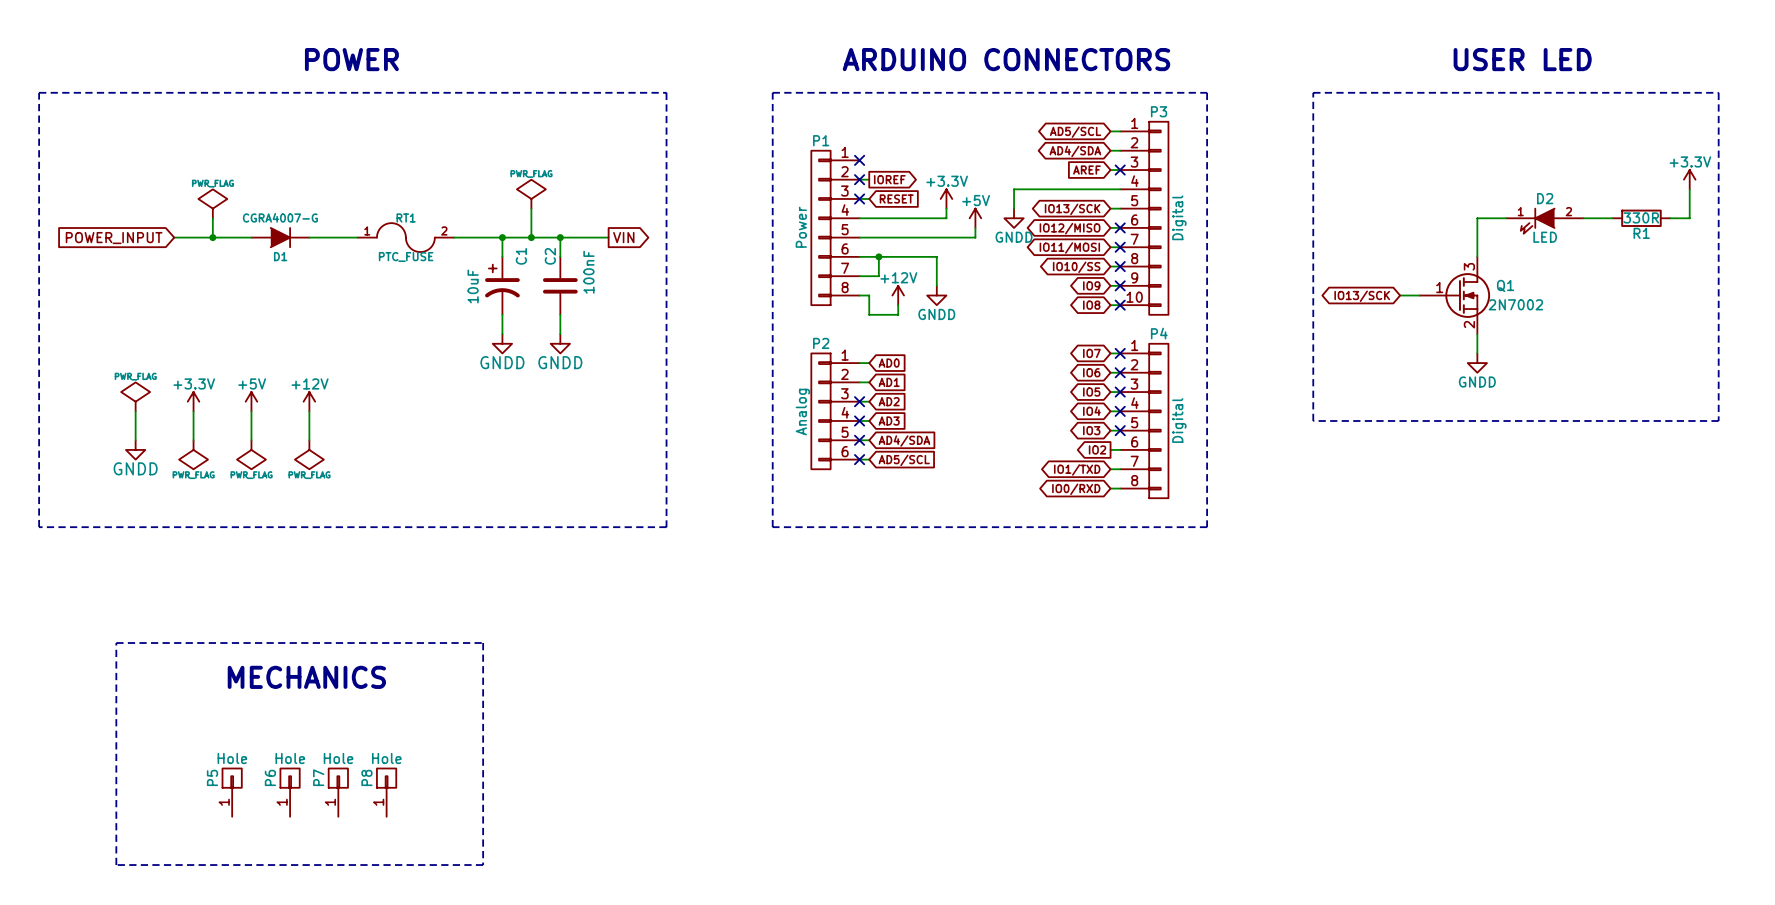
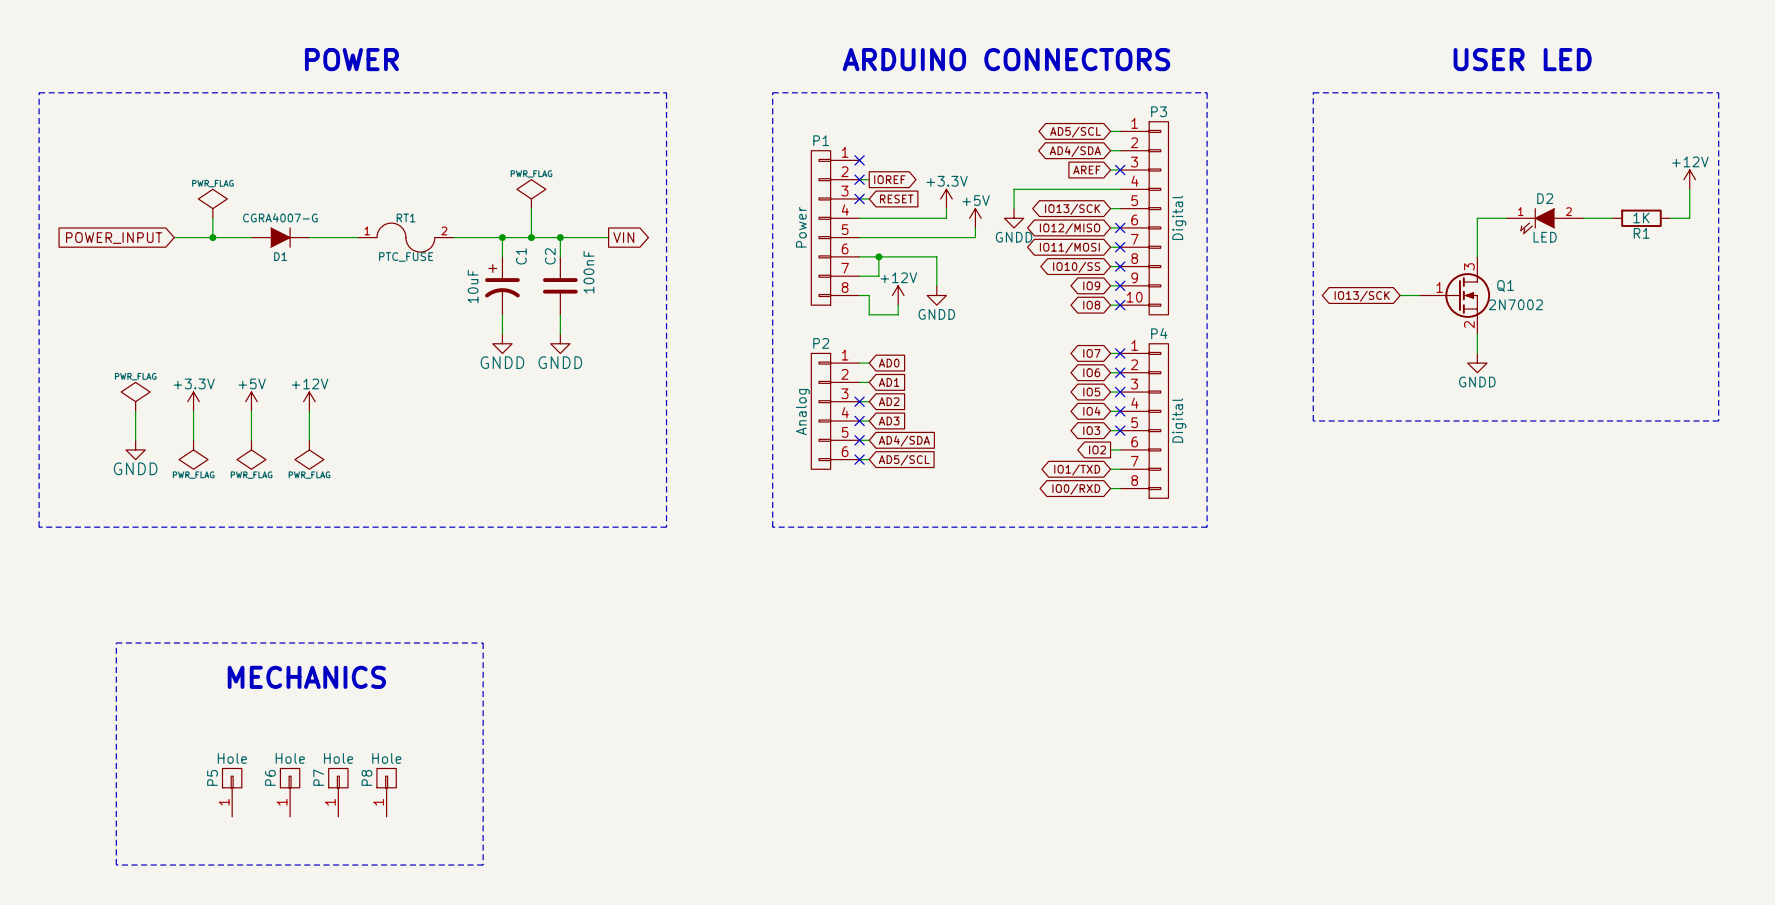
power symbol: +3.3V (1689, 179) -> +12V (1689, 179)
R1 value: 330R (1641, 217) -> 1K (1641, 217)

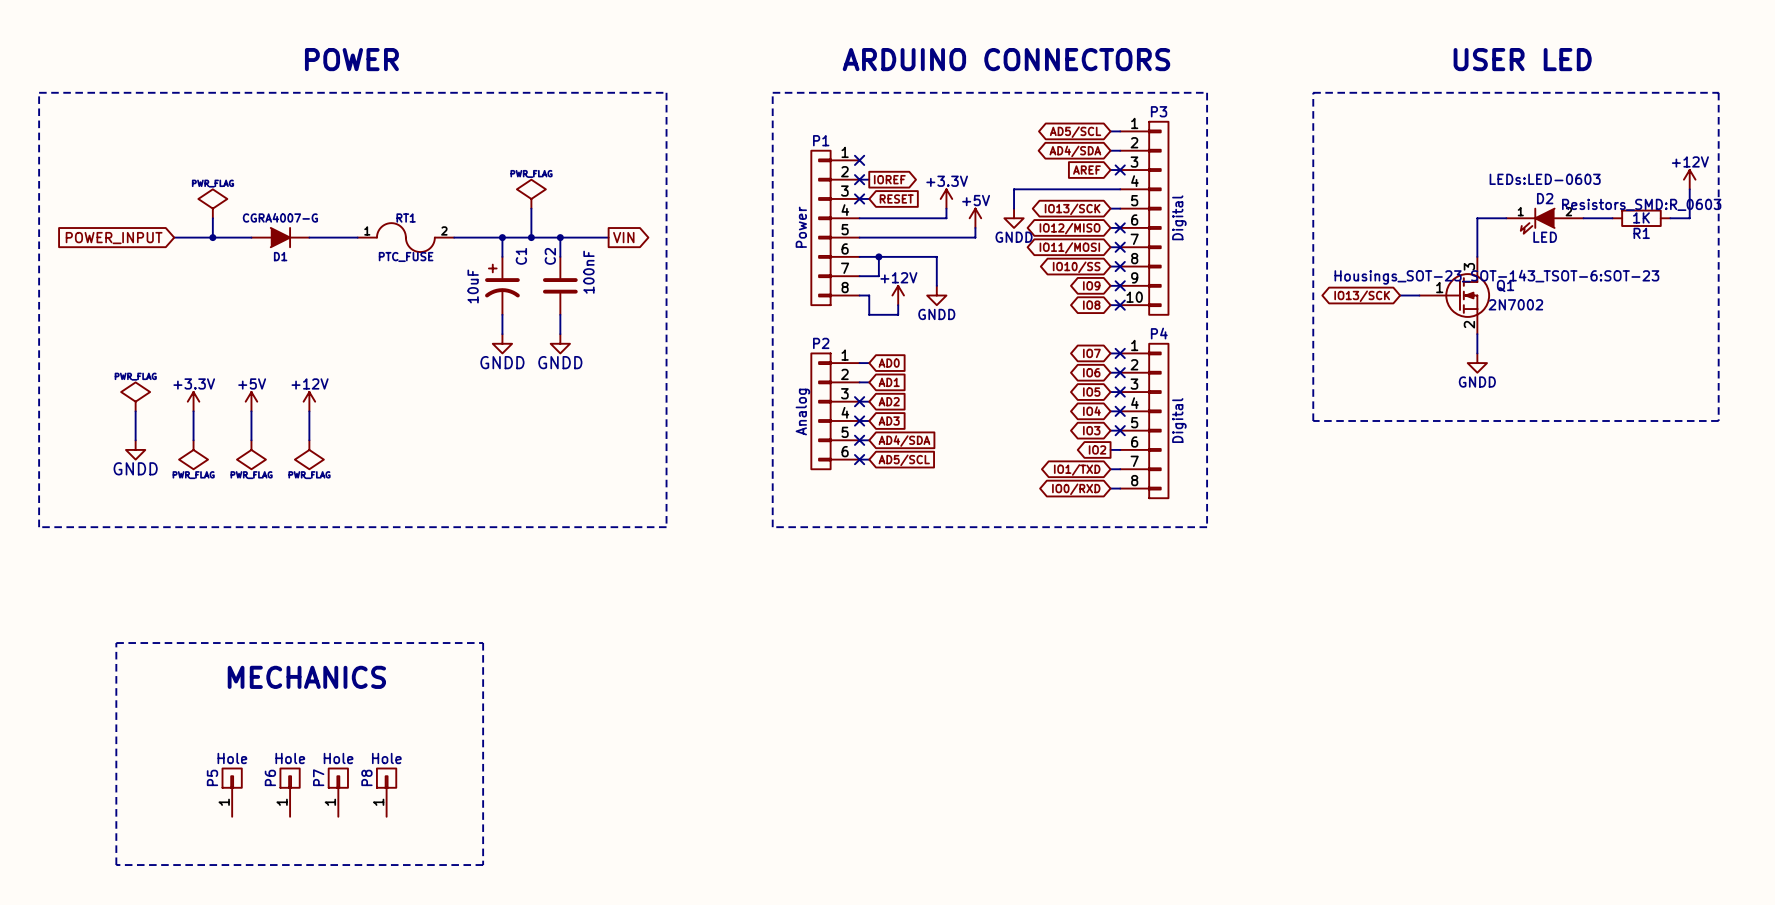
D2 text: none -> LEDs:LED-0603 (1545, 179)
R1 text: none -> Resistors_SMD:R_0603 (1641, 204)
Q1 text: none -> Housings_SOT-23_SOT-143_TSOT-6:SOT-23 (1496, 277)

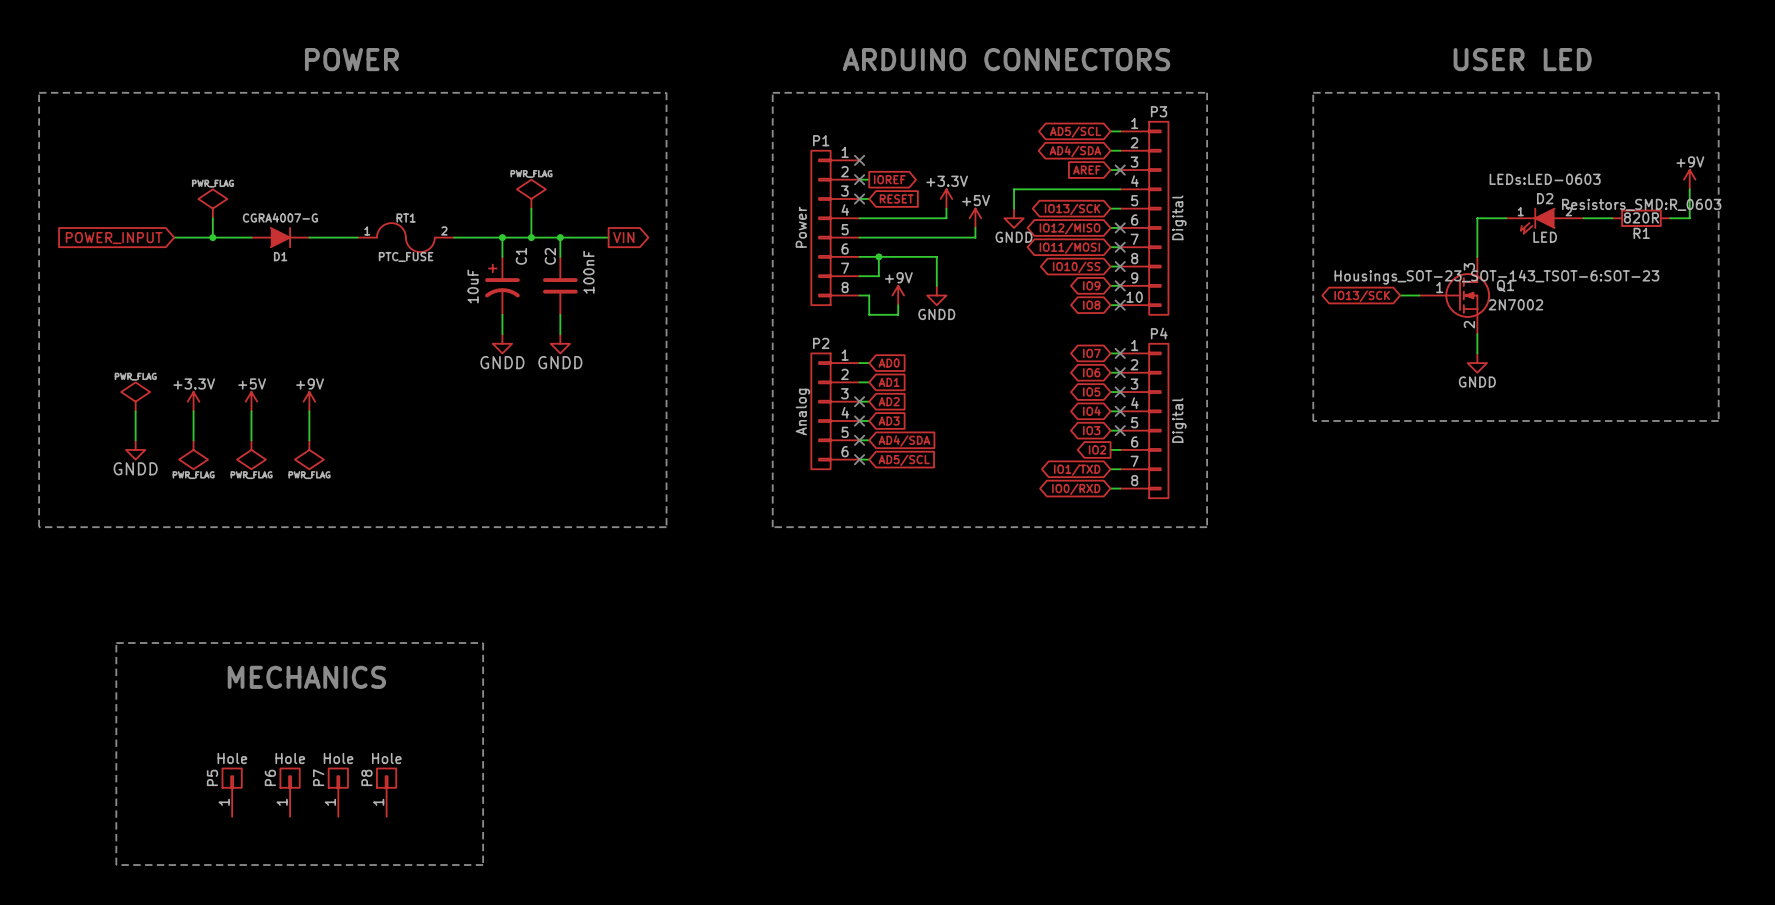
power symbol: +12V (1689, 179) -> +9V (1689, 179)
R1 value: 1K (1641, 217) -> 820R (1641, 217)
power symbol: +12V (898, 295) -> +9V (898, 295)
power symbol: +12V (309, 401) -> +9V (309, 401)

